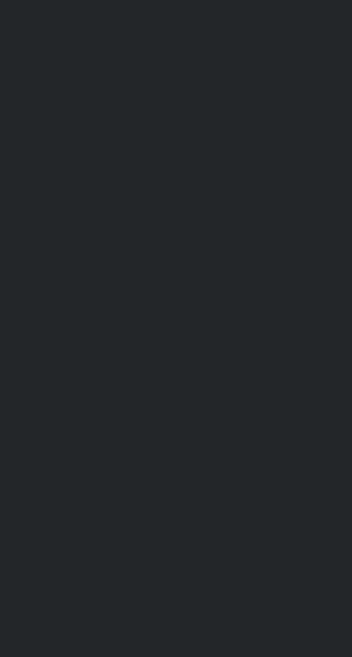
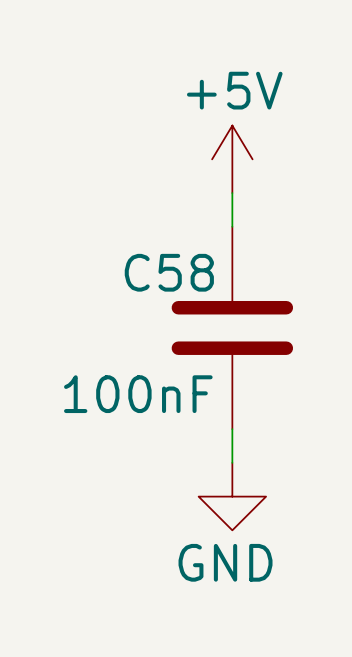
power symbol: none -> +5V (232, 159)
wire: none -> (232, 193) (232, 226)
C58: none -> 100nF (232, 327)
wire: none -> (232, 429) (232, 462)
power symbol: none -> GND (232, 496)

